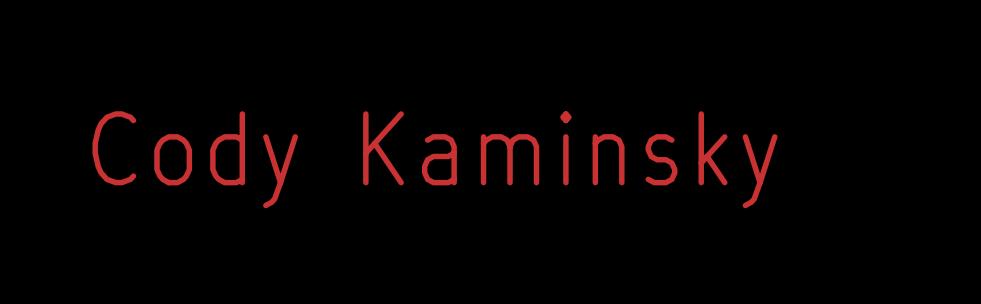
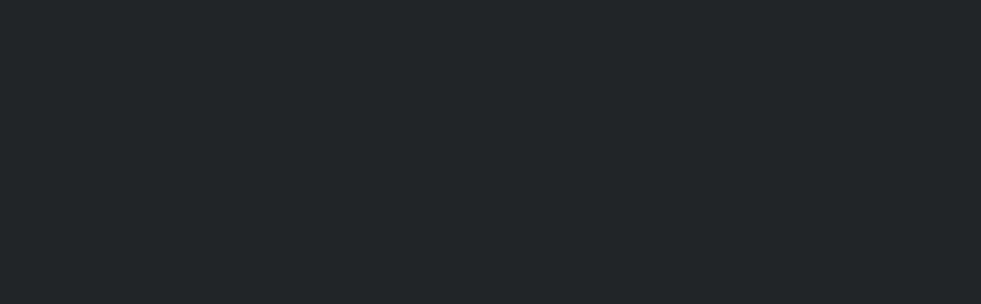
text: Cody Kaminsky (434, 159) -> none

